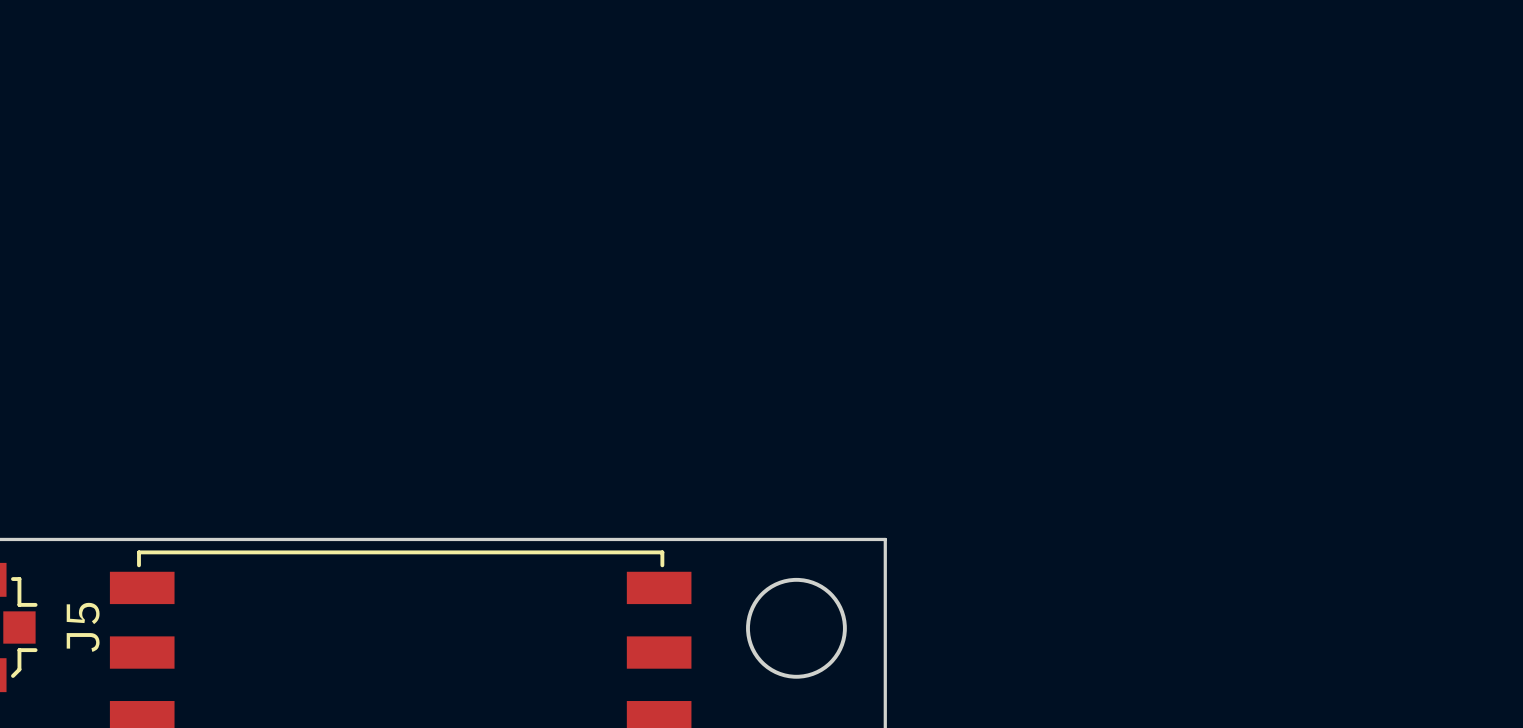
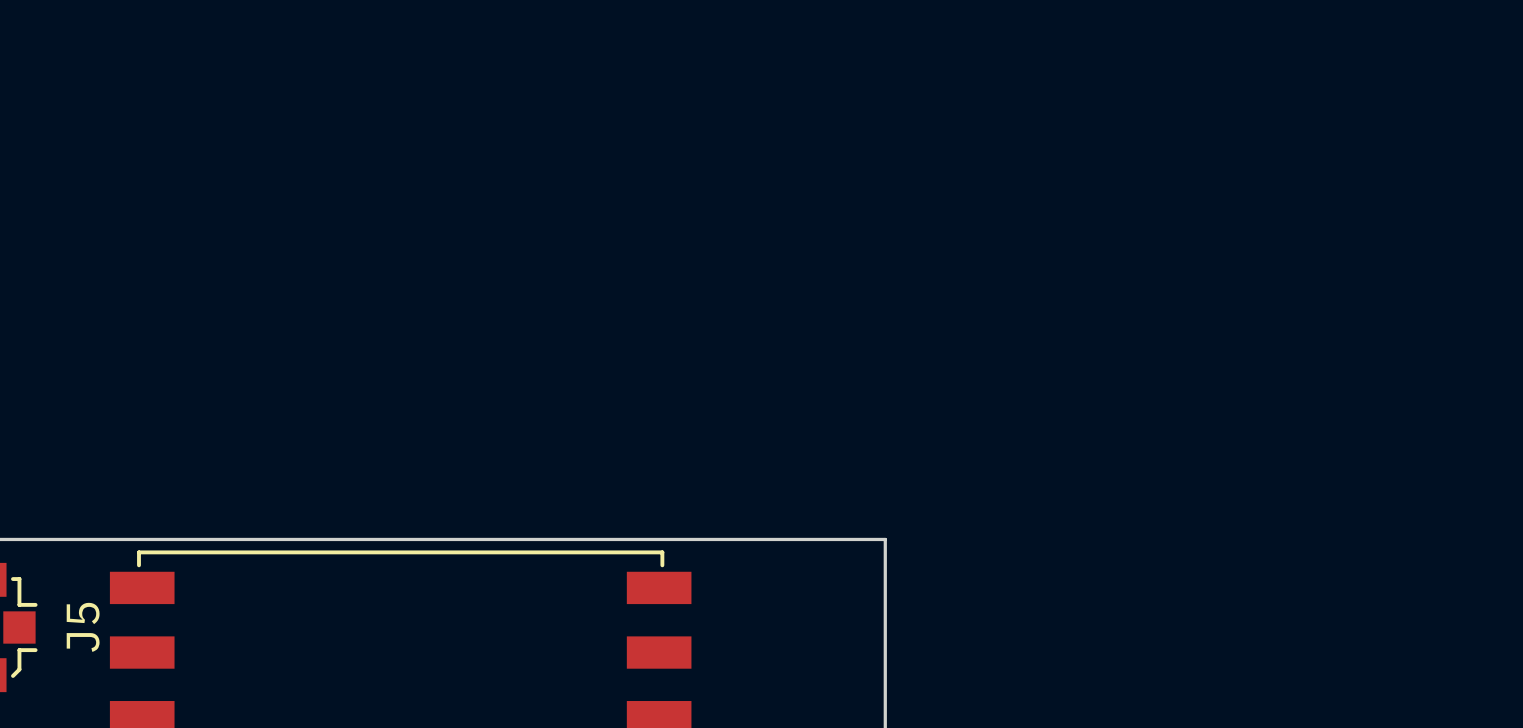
round board edge: [746, 577, 847, 679] -> none

